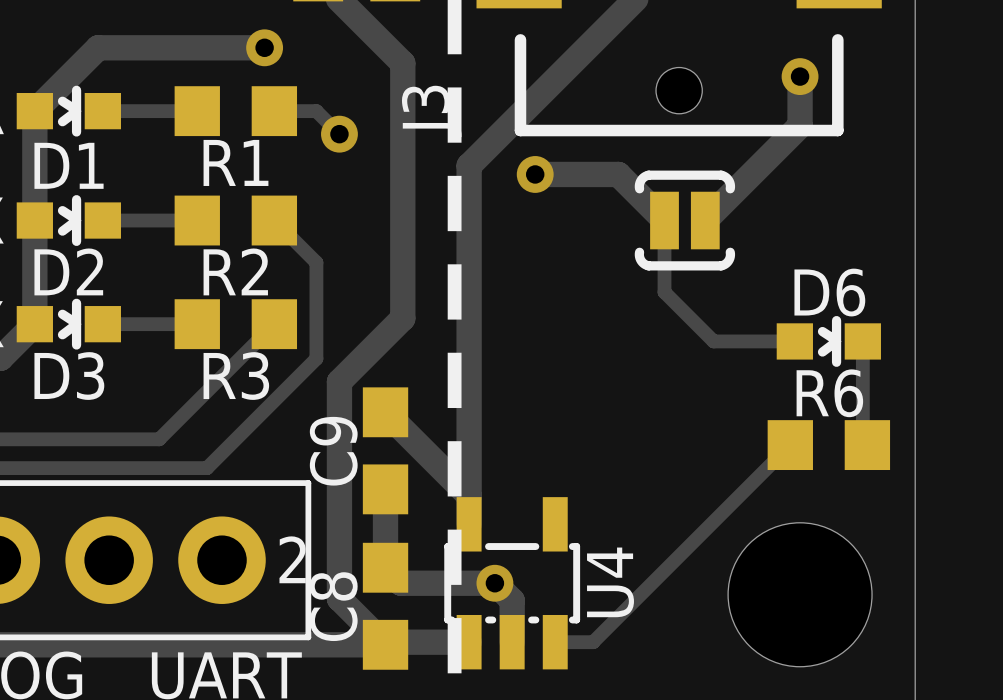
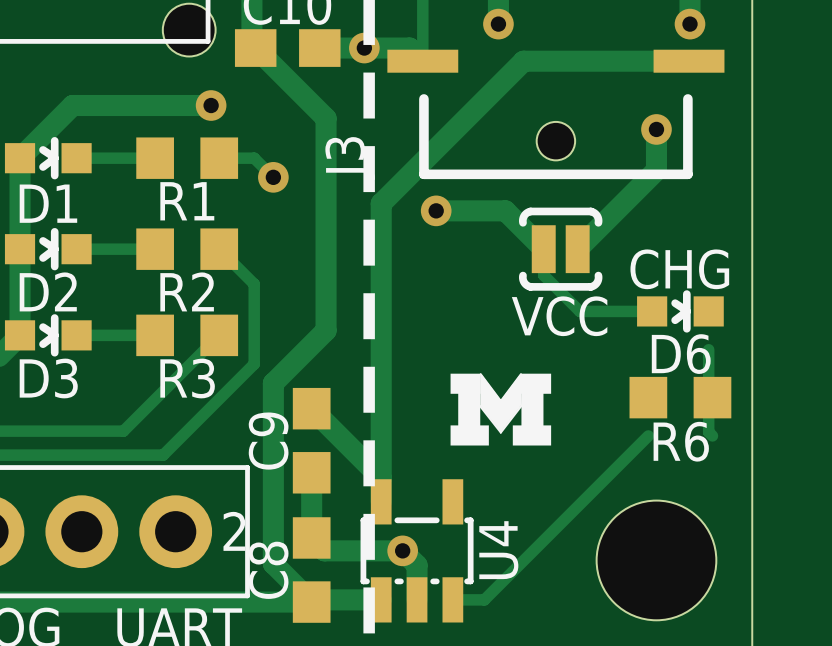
text: none -> CHG (679, 269)
track: (664, 251) (664, 292) (713, 341) (794, 341) -> (543, 275) (579, 311) (652, 311)
D6 name position: D6 (829, 292) -> D6 (681, 354)
text: none -> VCC (559, 316)
D6 position: (828, 341) -> (680, 311)
drawing: none -> [450, 373, 552, 446]
R6 name position: R6 (829, 393) -> R6 (681, 441)
R6 position: (828, 445) -> (680, 397)

